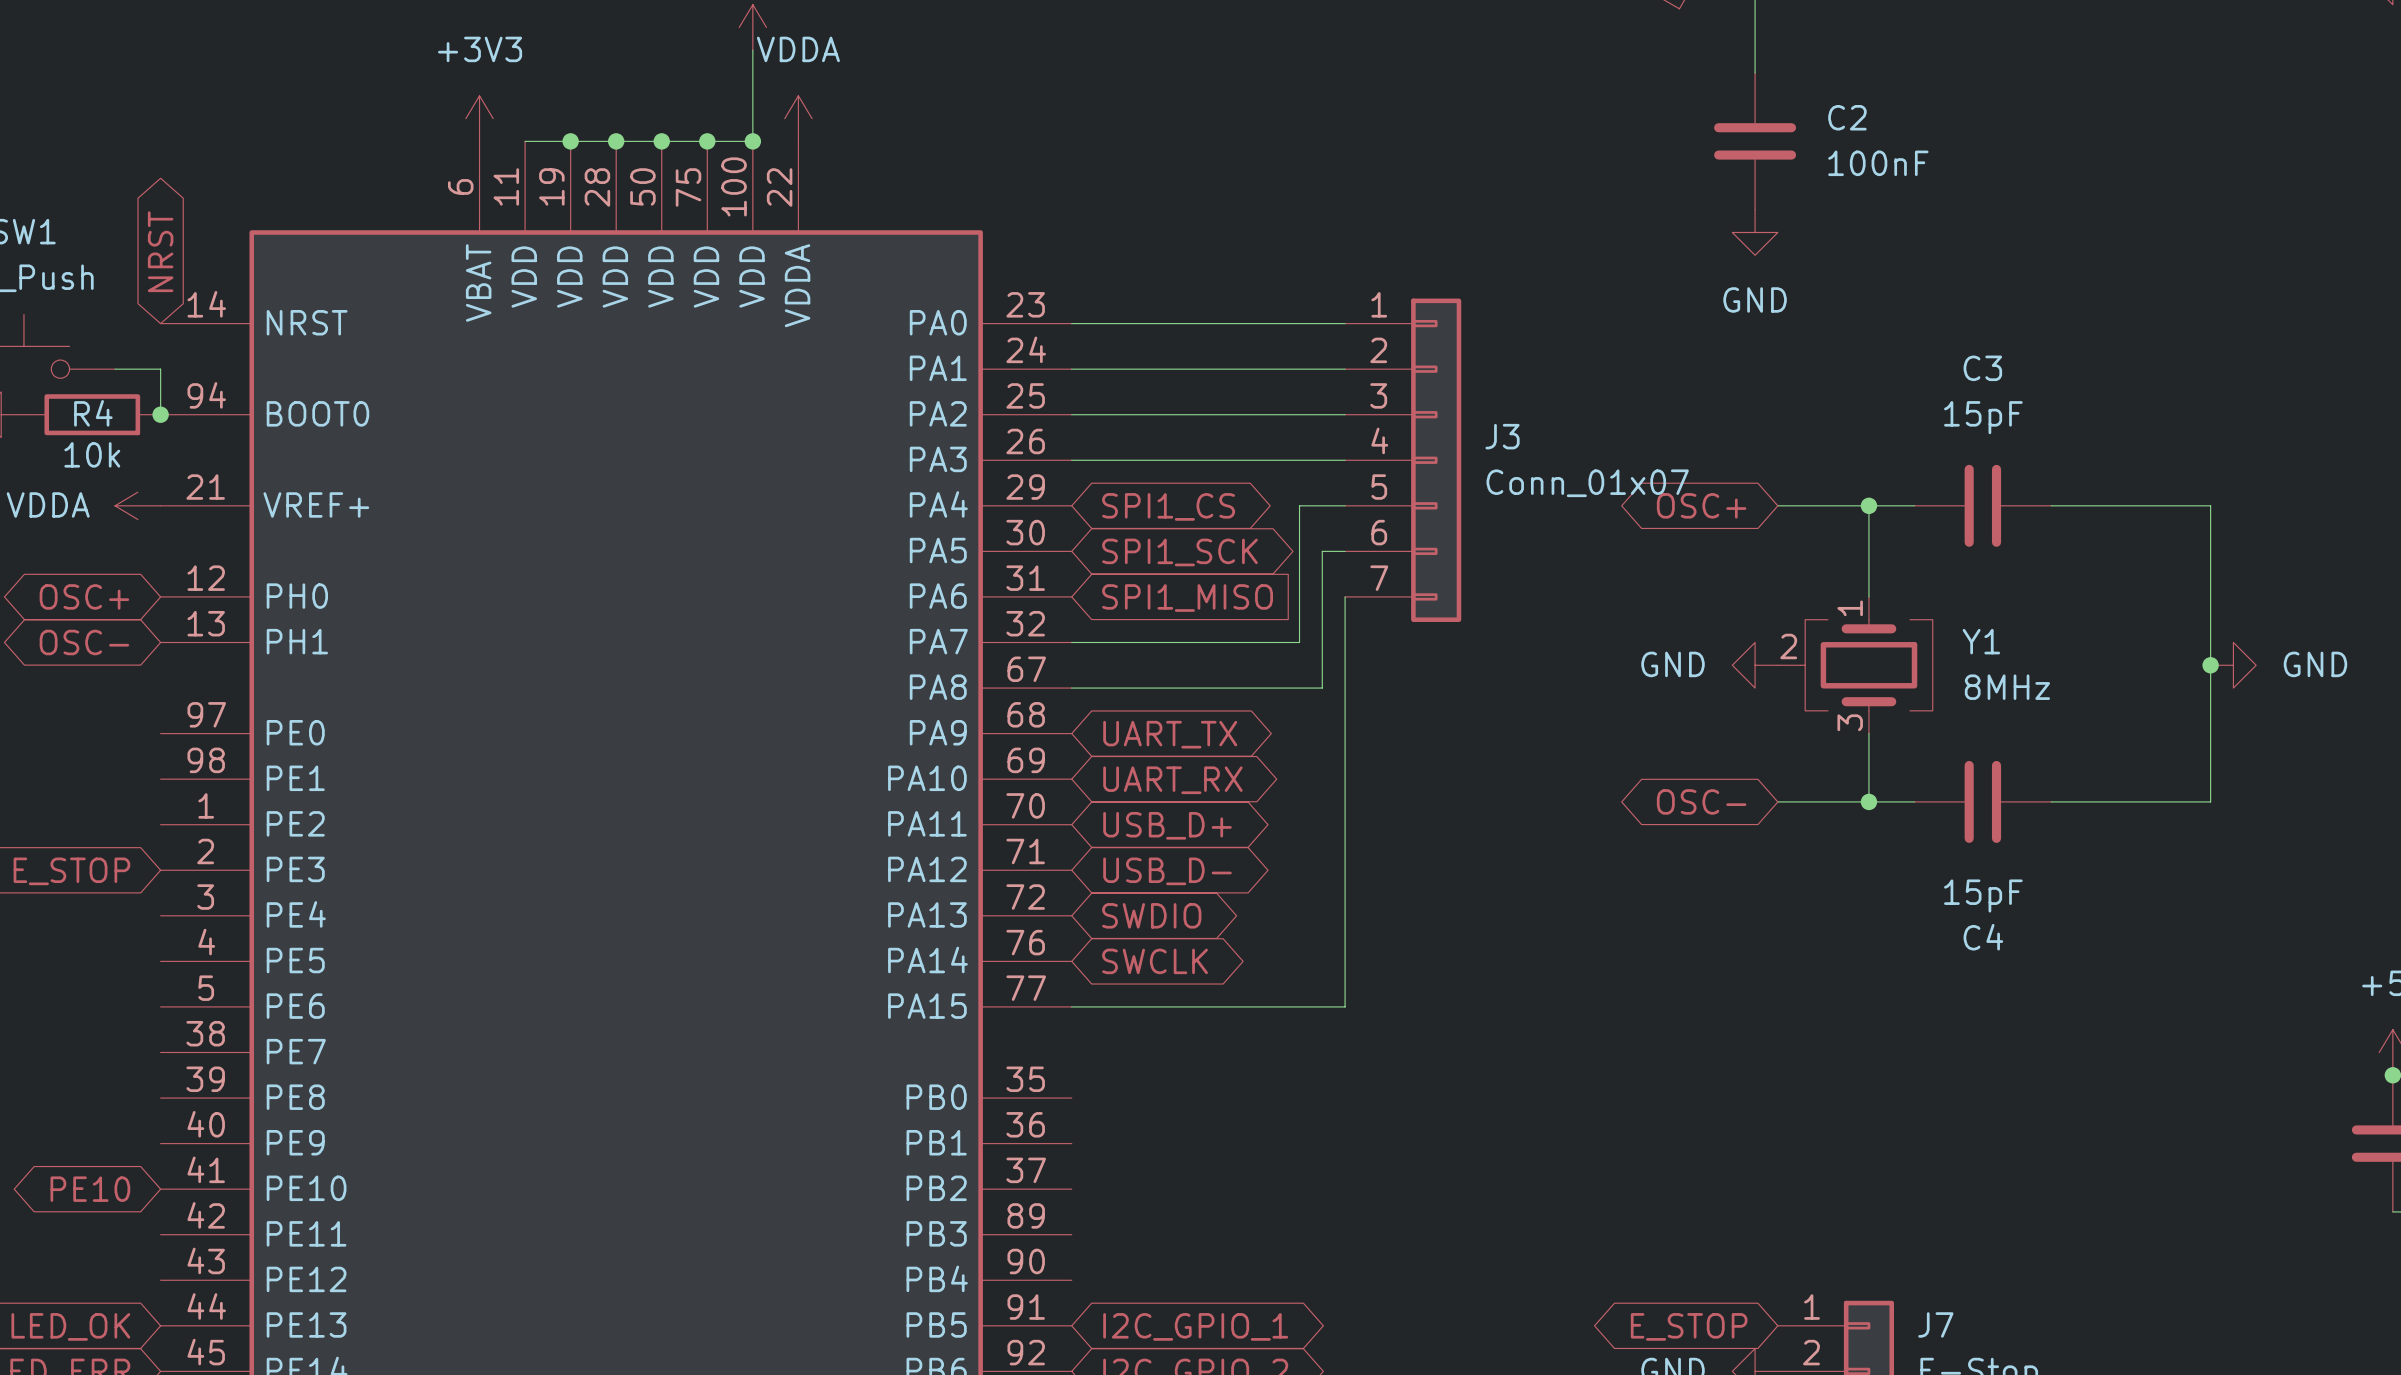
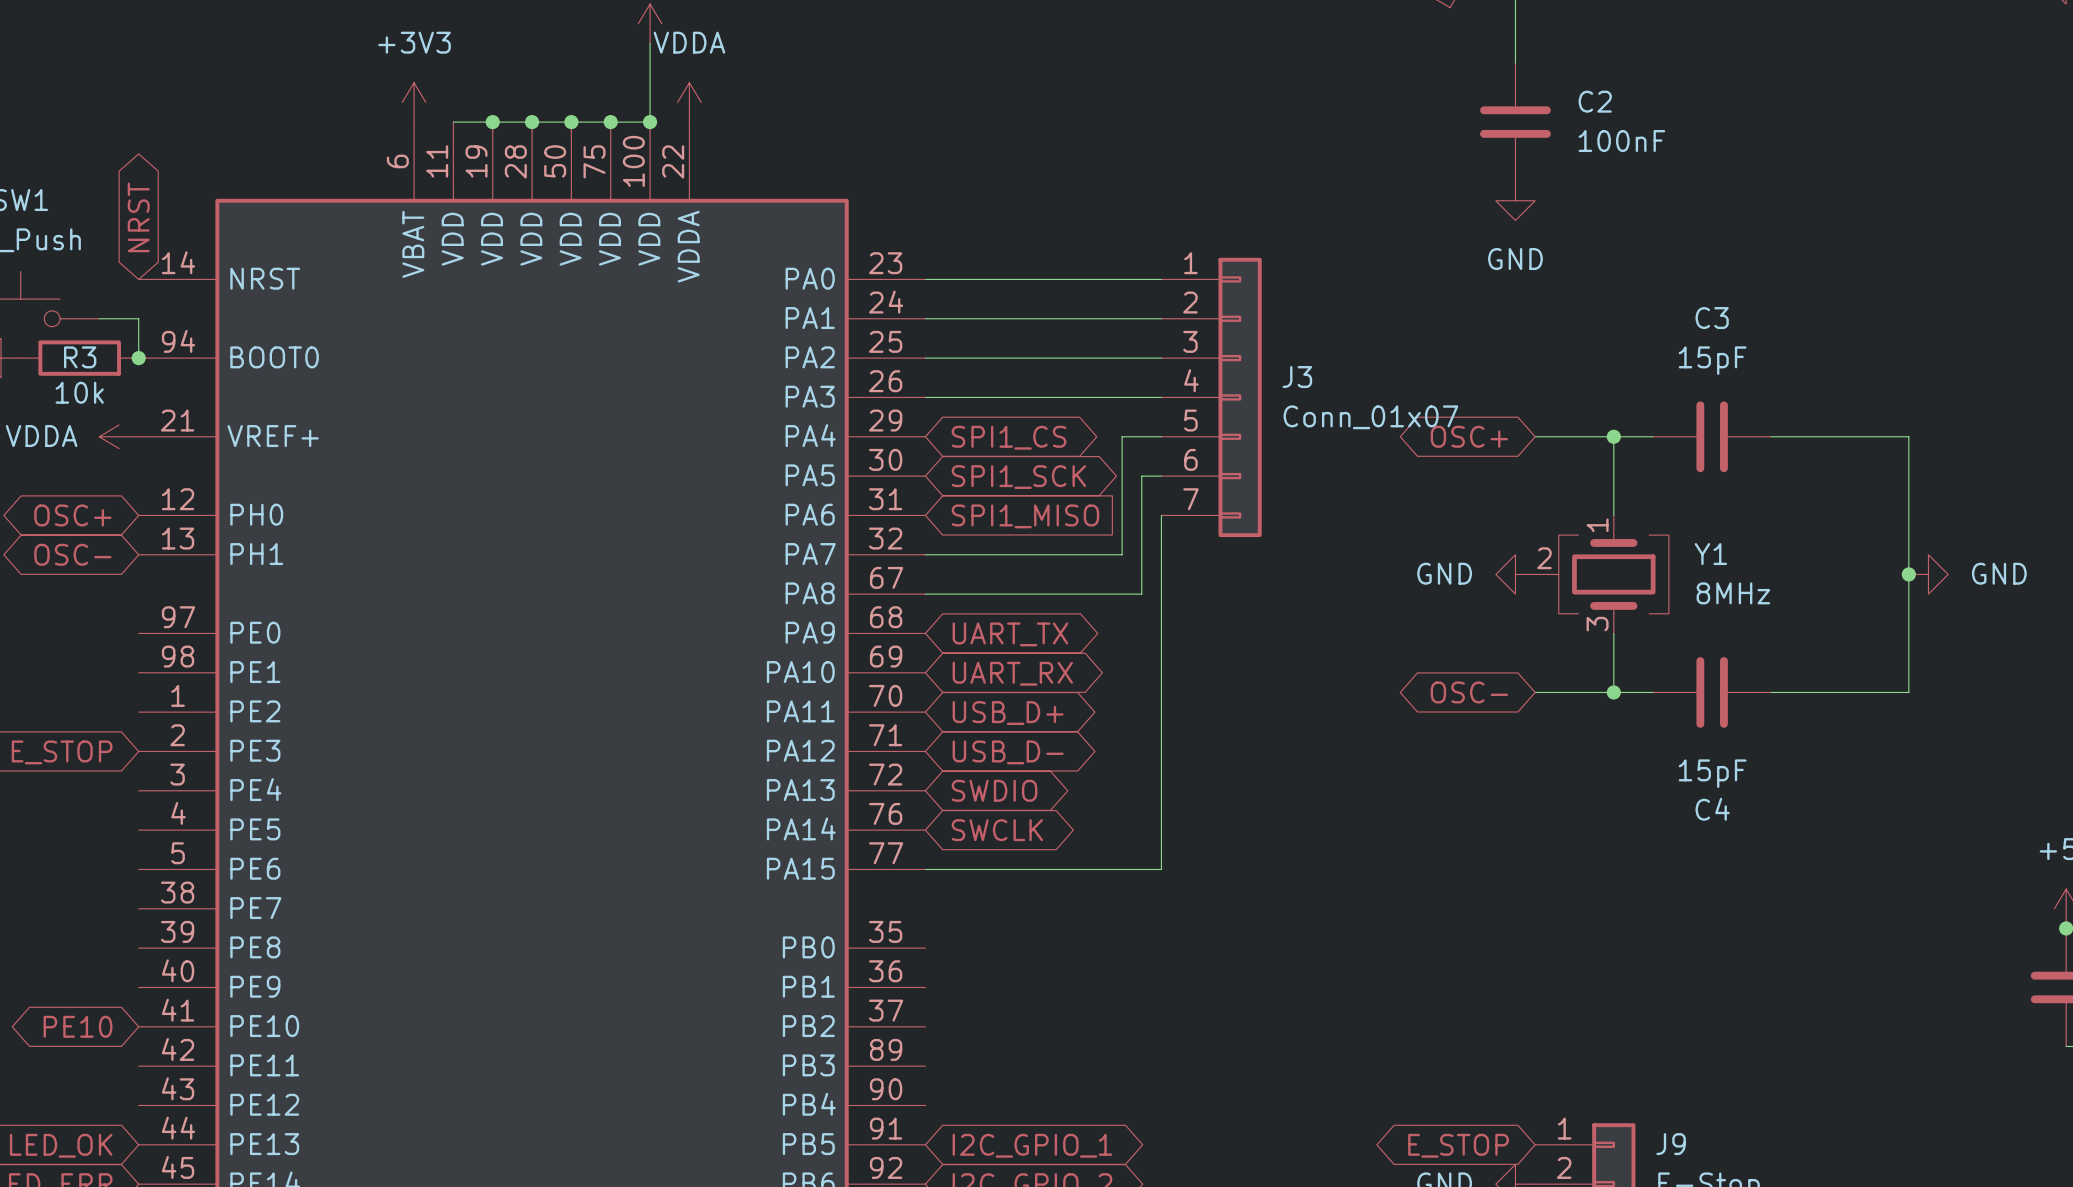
R4 name: R4 (93, 413) -> R3 (80, 357)
J7 name: J7 (1935, 1324) -> J9 (1671, 1144)

